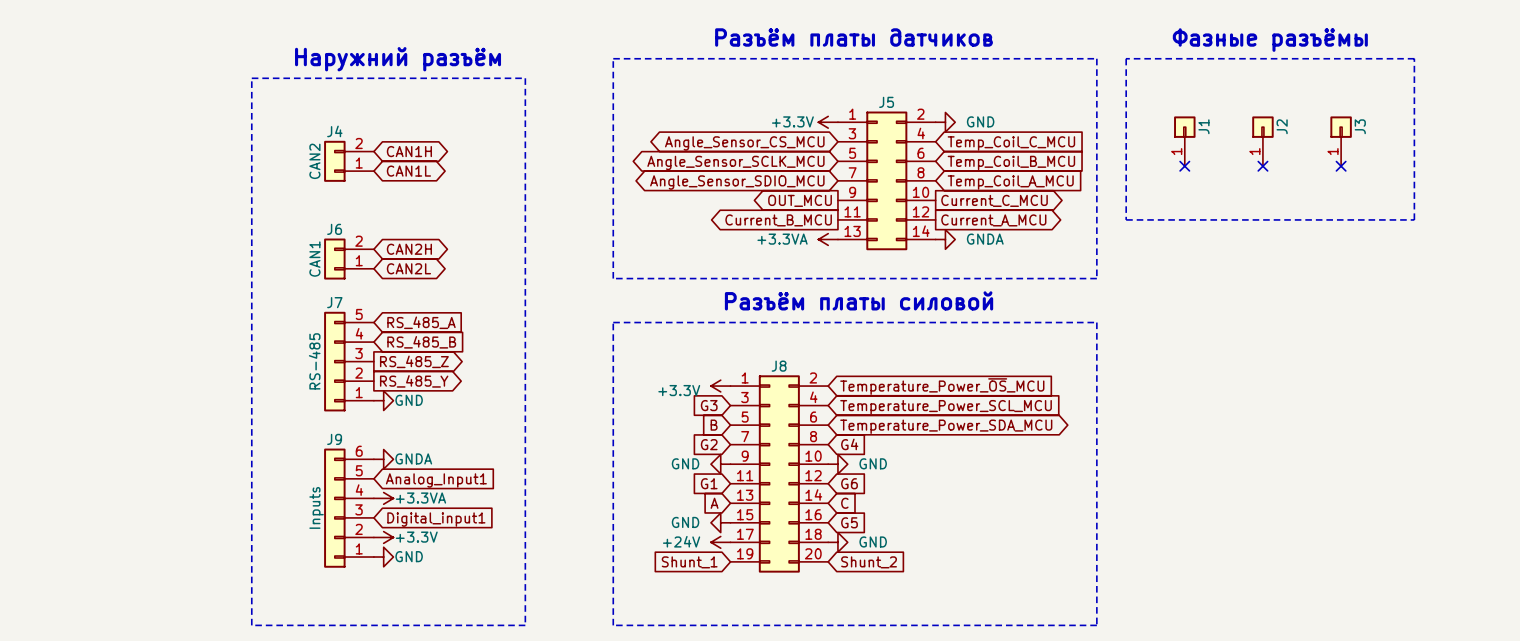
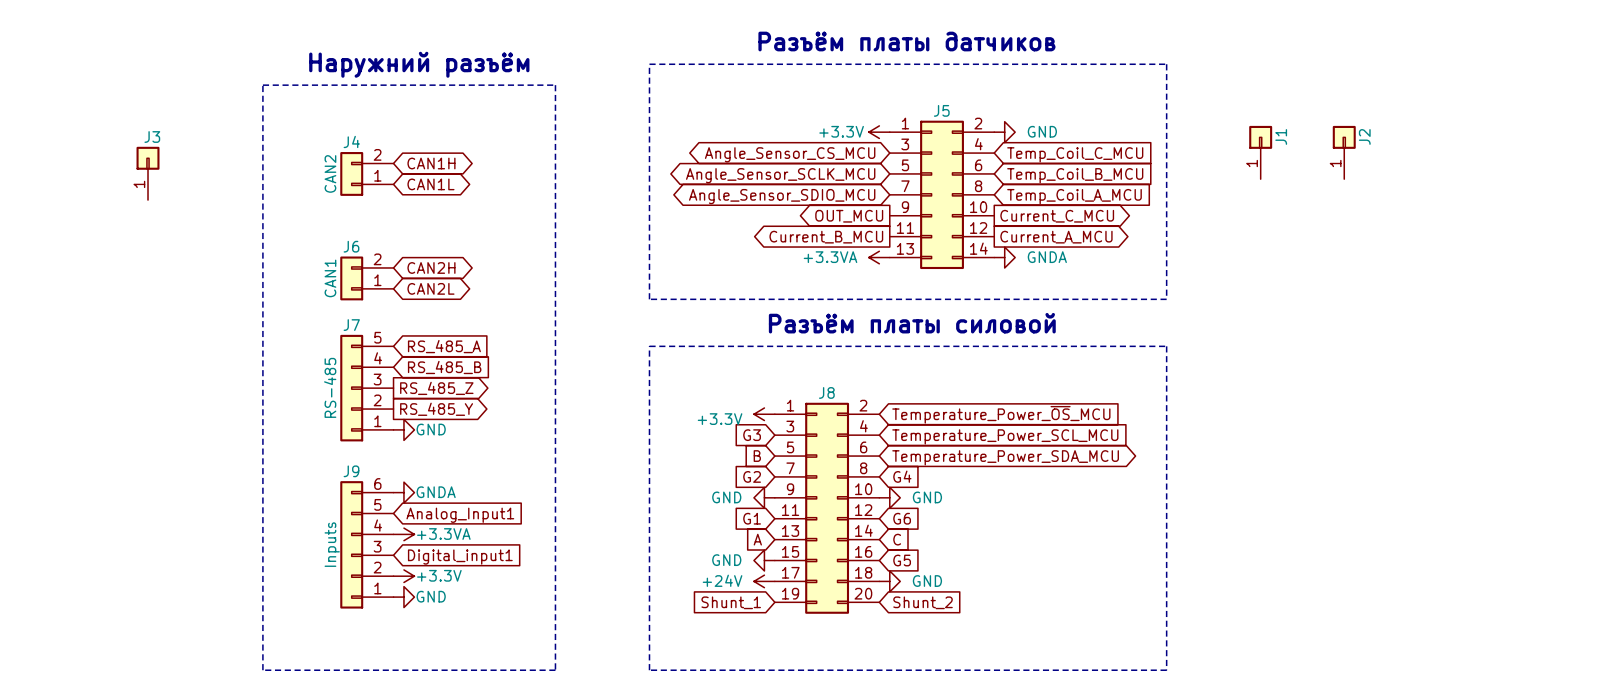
text: Фазные разъёмы (1270, 40) -> none
line: (1126, 58) (1414, 58) (1414, 219) (1126, 219) (1126, 58) -> none
J3 name rotation: 0° (1360, 126) -> 90° clockwise (152, 137)
J3 name position: J3 (1360, 126) -> J3 (152, 137)
J3 position: (1341, 141) -> (148, 173)
no-connect mark: (1184, 166) -> none
no-connect mark: (1262, 166) -> none
no-connect mark: (1341, 166) -> none

